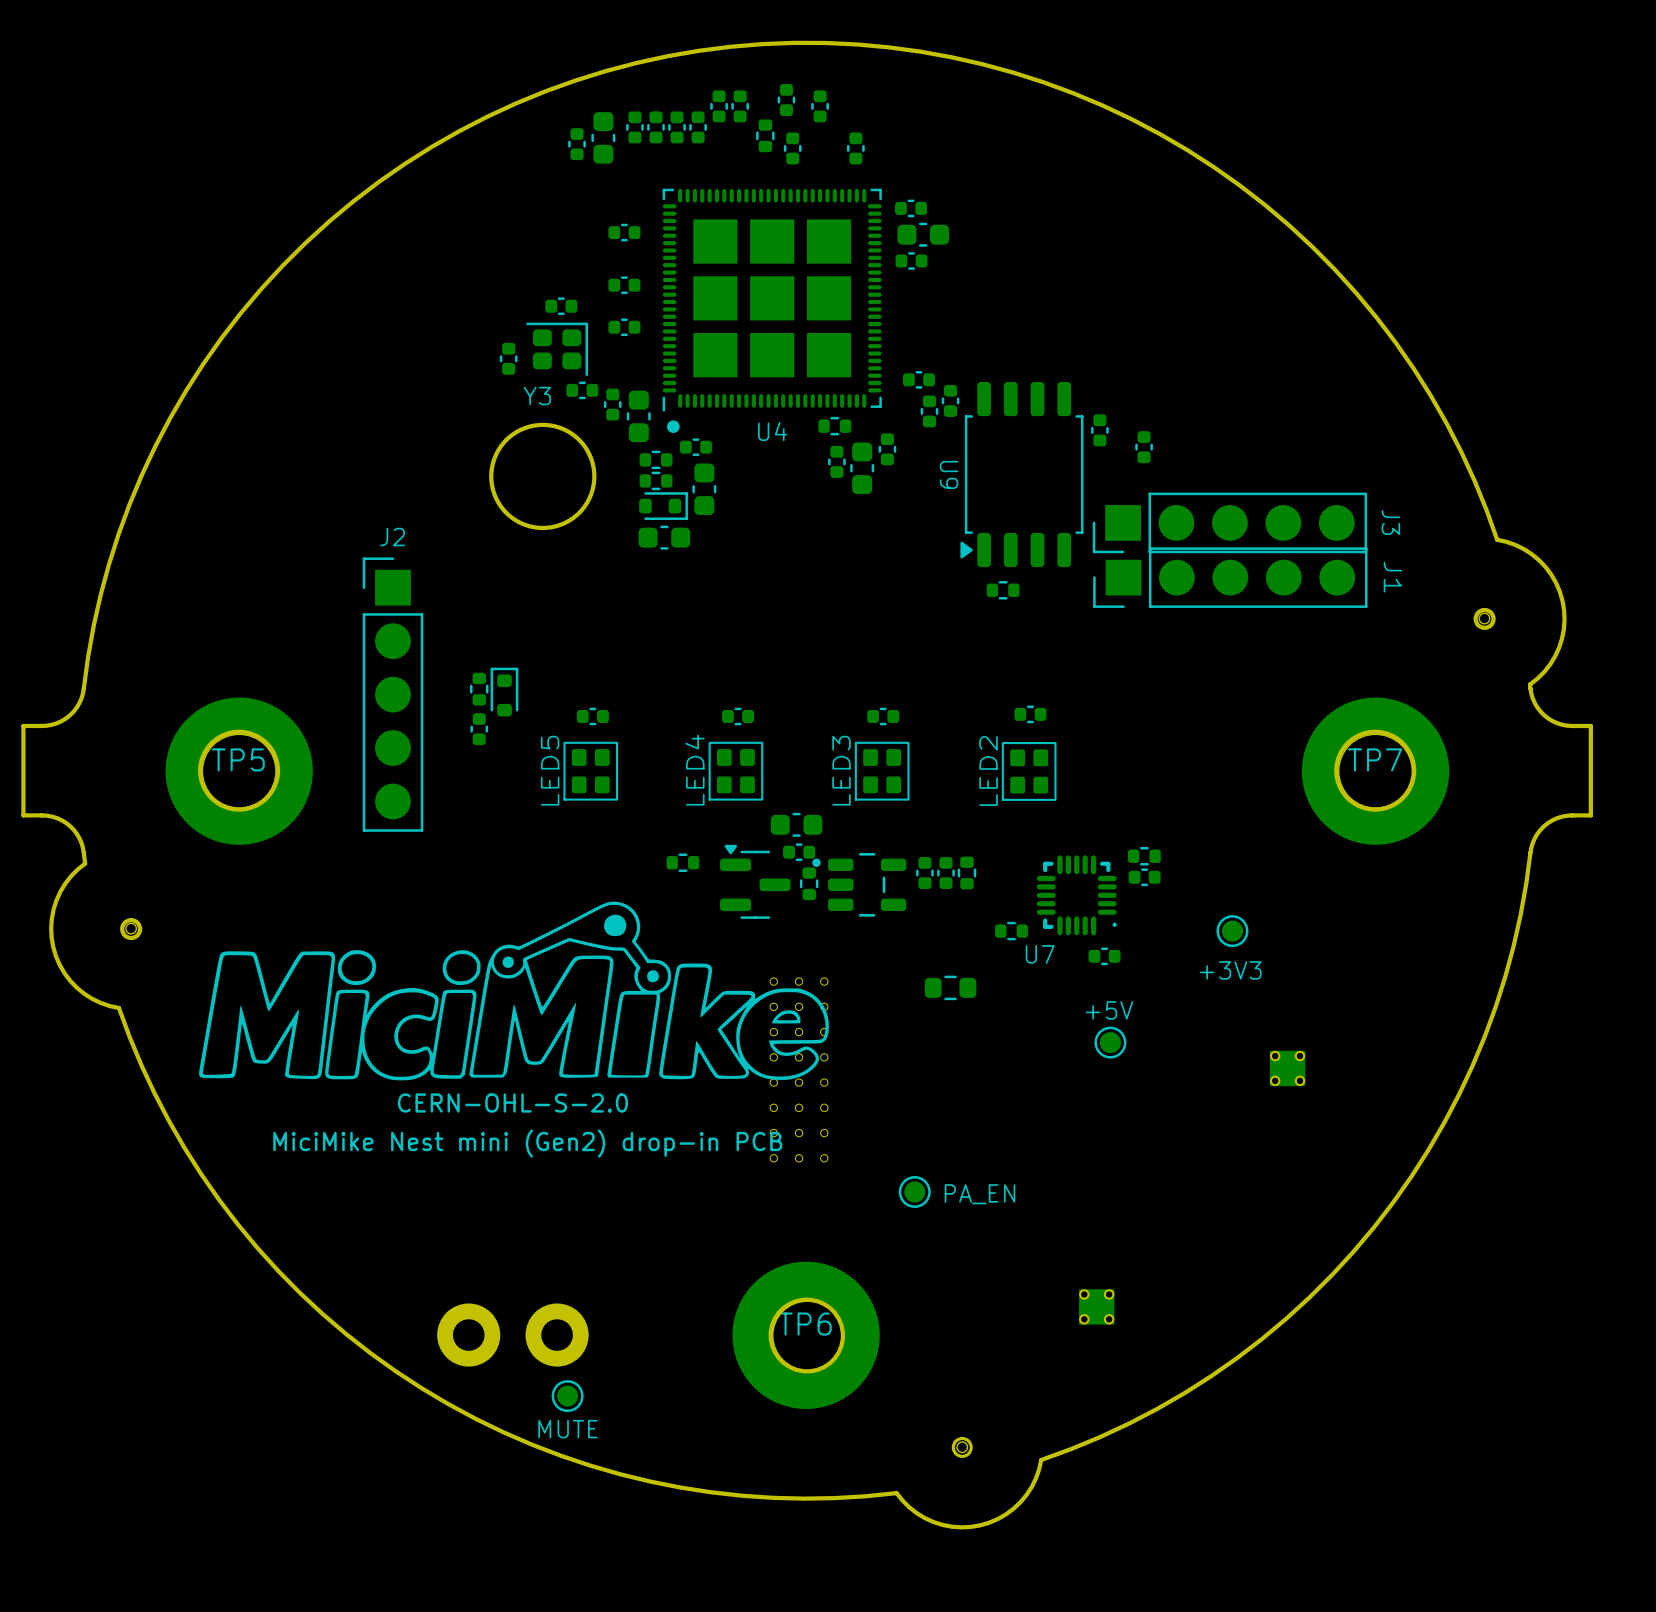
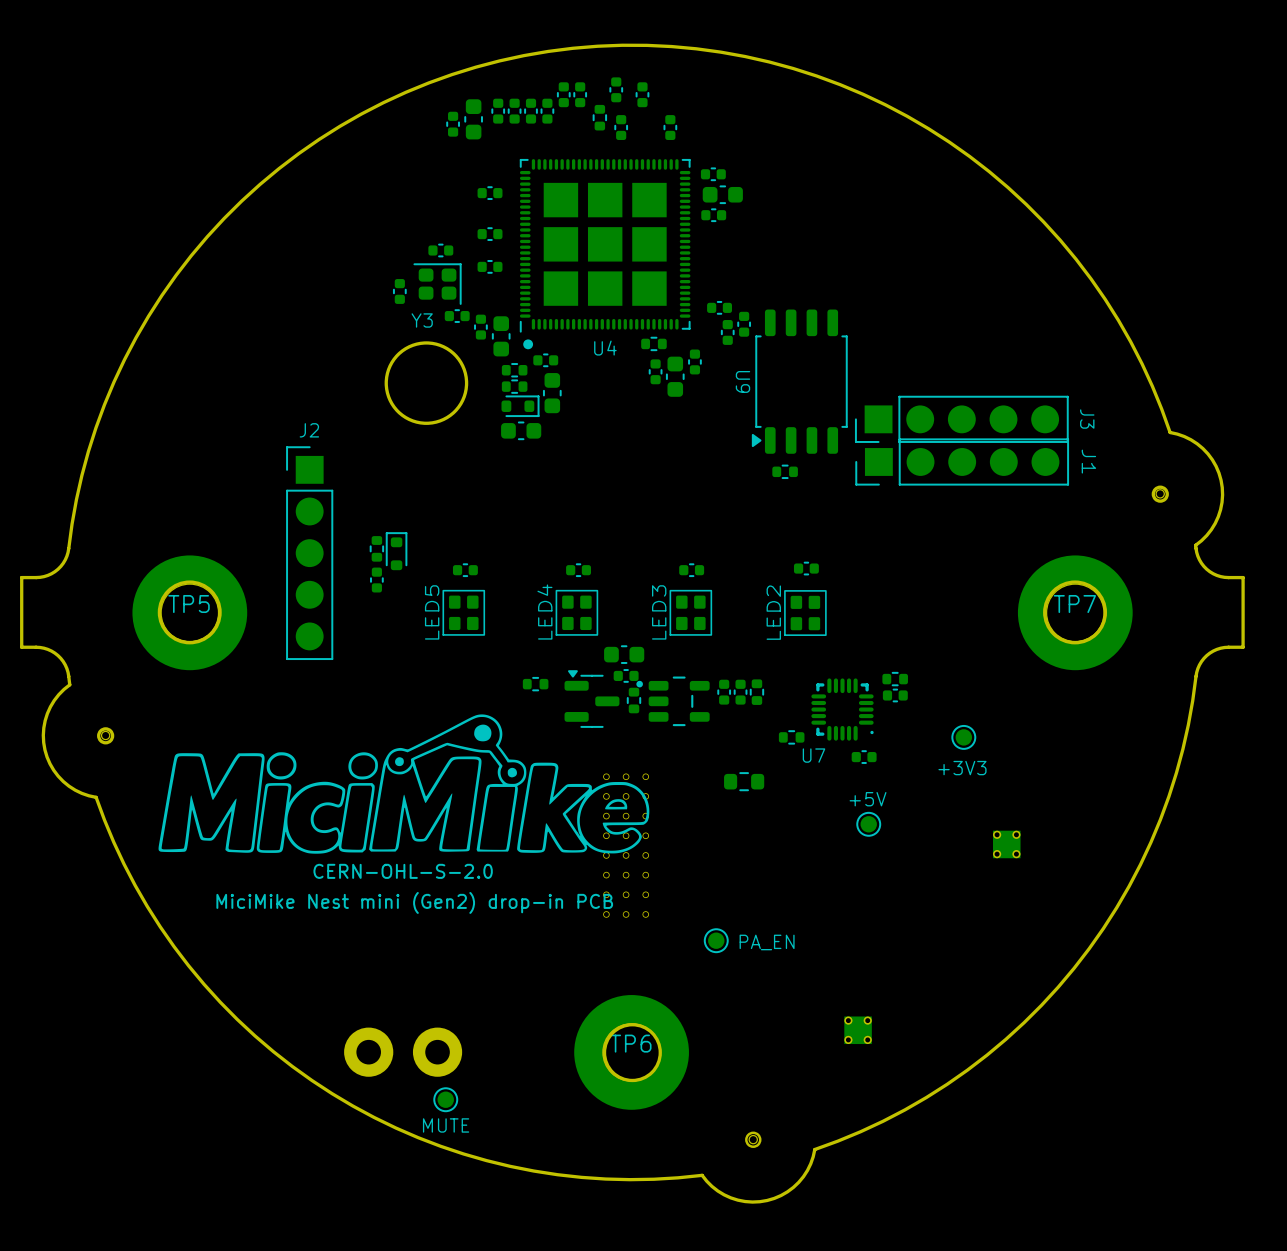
part: (1099, 430) -> none
part: (1144, 447) -> none

